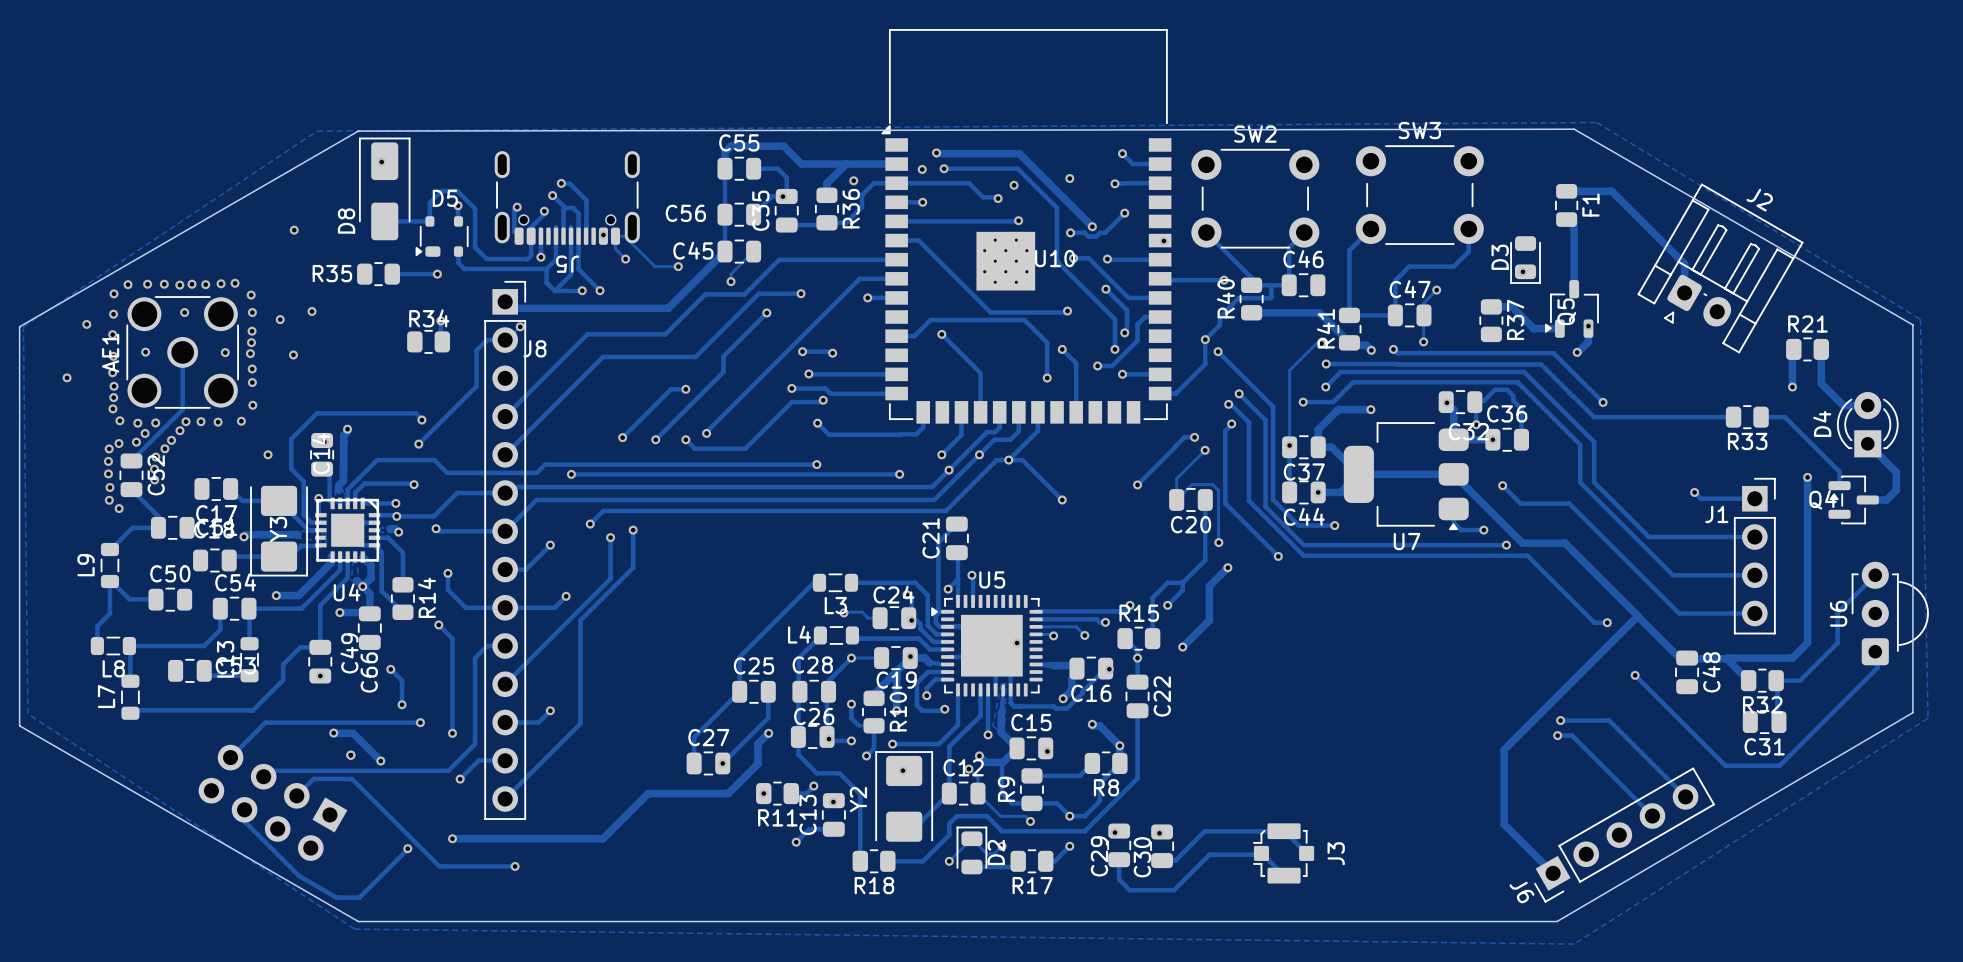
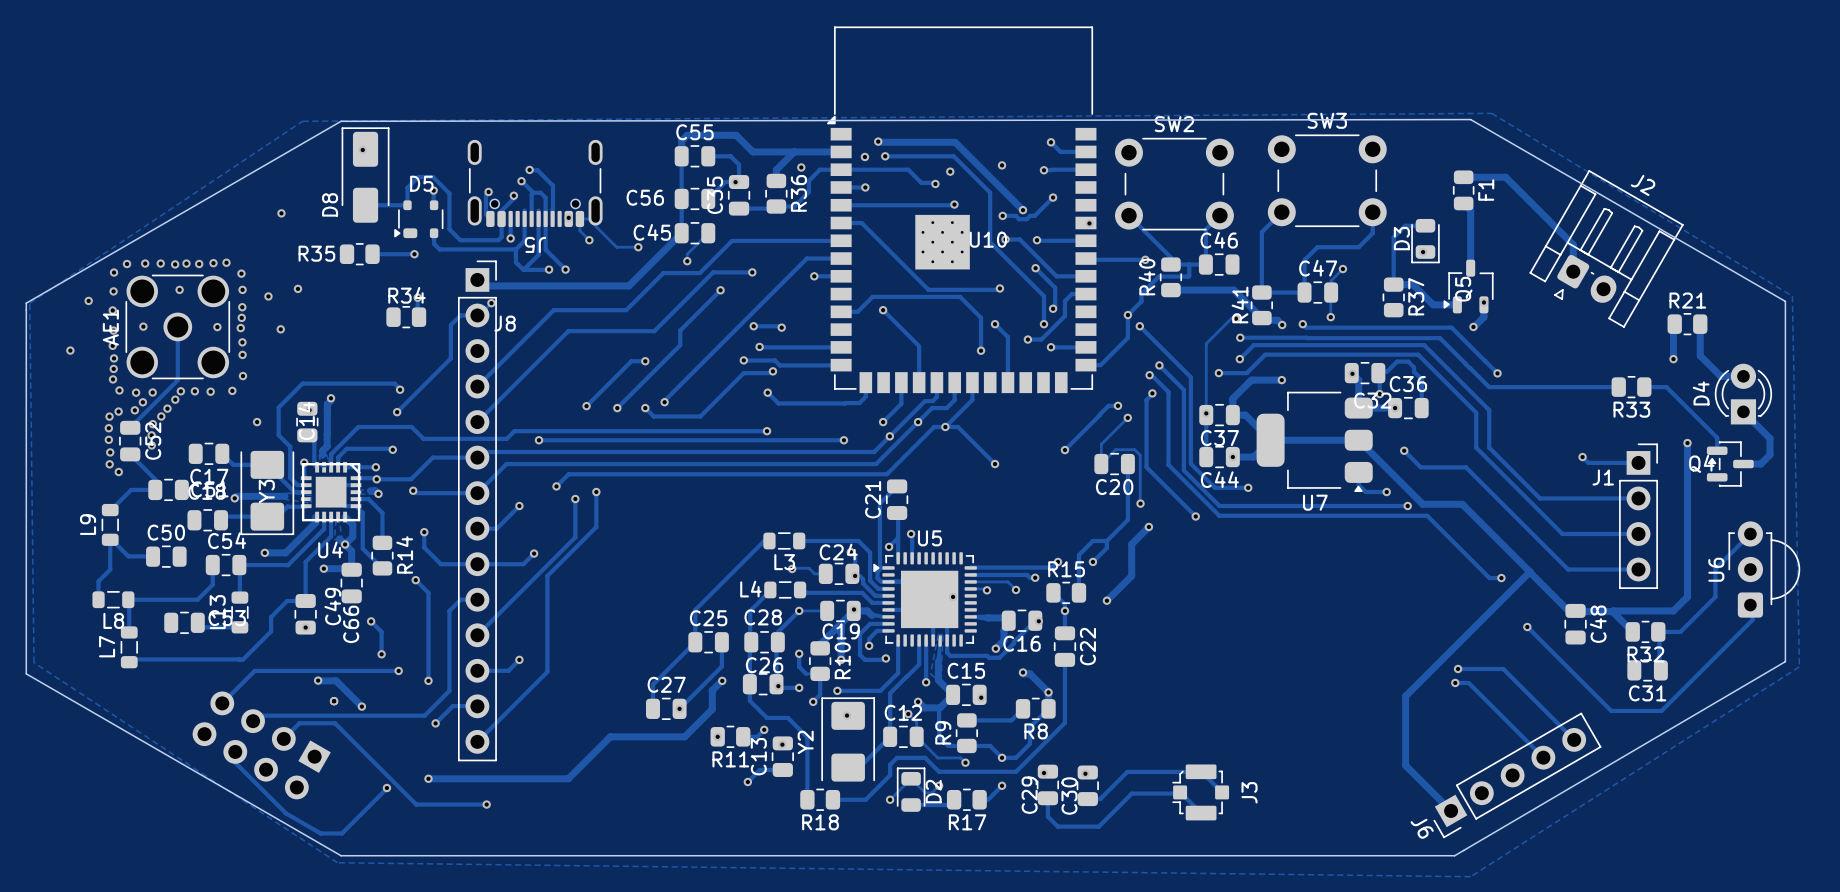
track: none -> (1425, 225) (1405, 225) (1393, 237) (1393, 284)

